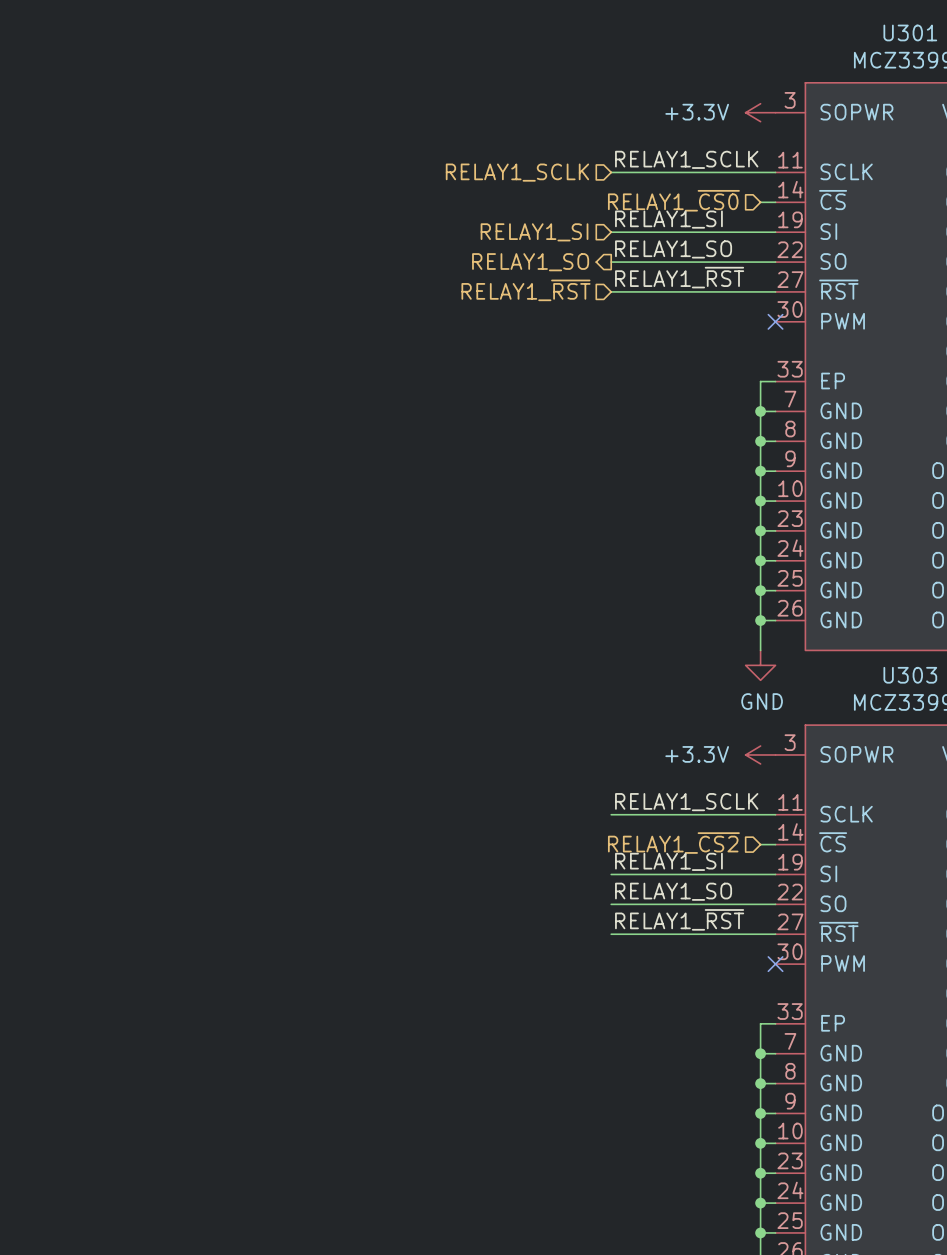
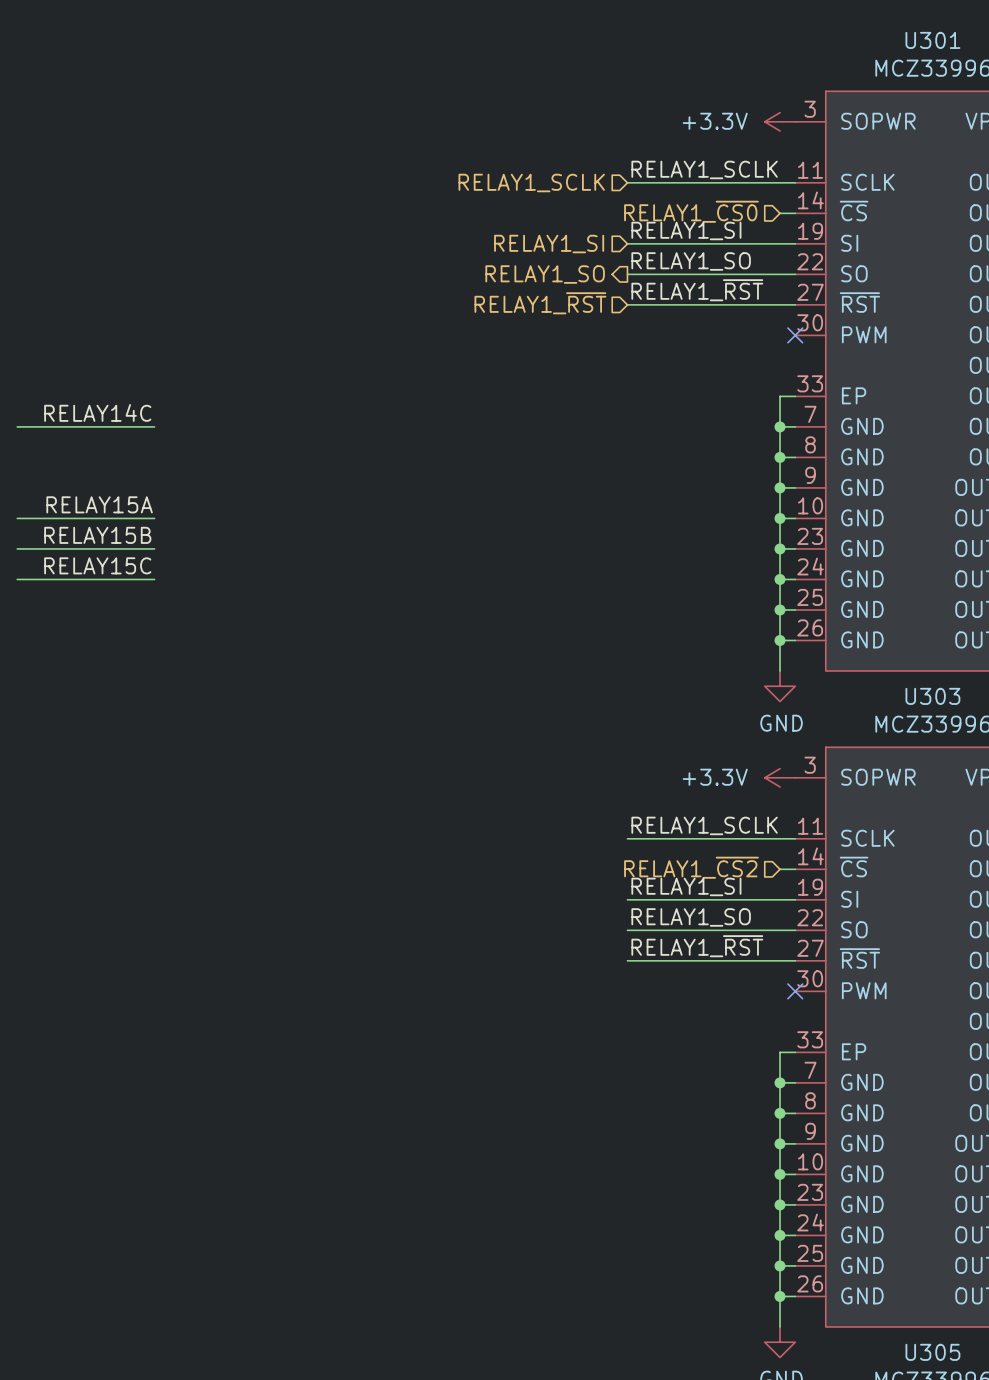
label: none -> RELAY14C (97, 412)
wire: none -> (17, 426) (154, 426)
label: none -> RELAY15A (99, 504)
wire: none -> (17, 518) (154, 518)
label: none -> RELAY15B (97, 535)
wire: none -> (17, 548) (154, 548)
label: none -> RELAY15C (97, 565)
wire: none -> (17, 579) (154, 579)

